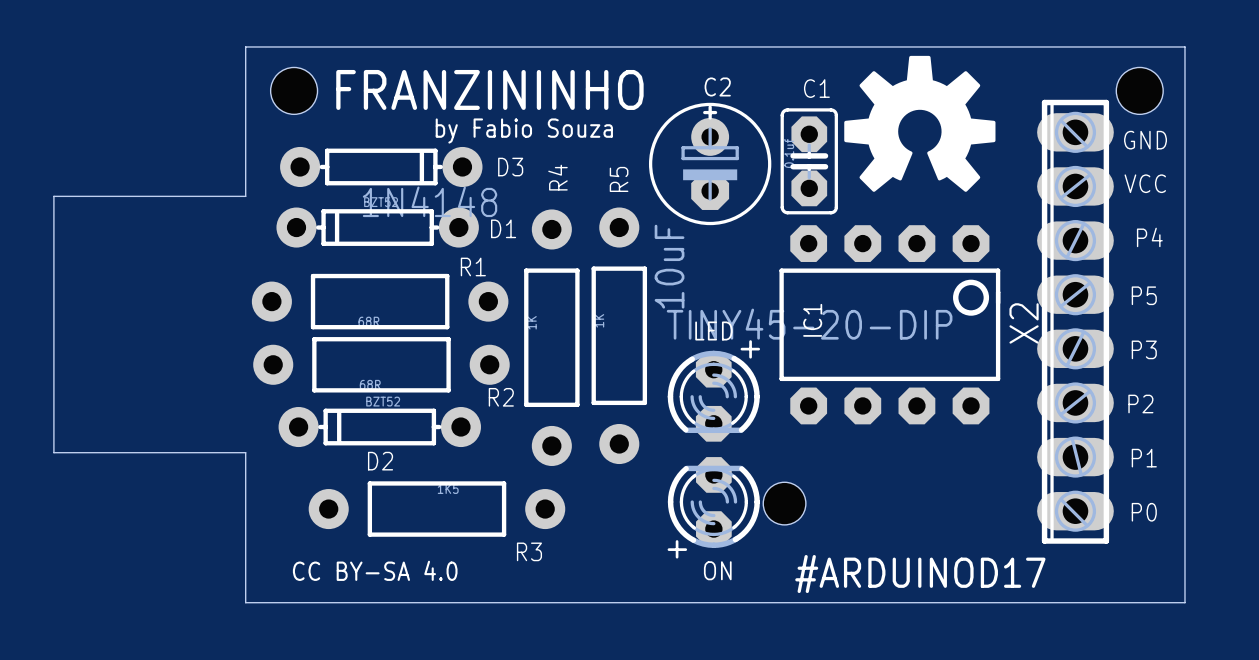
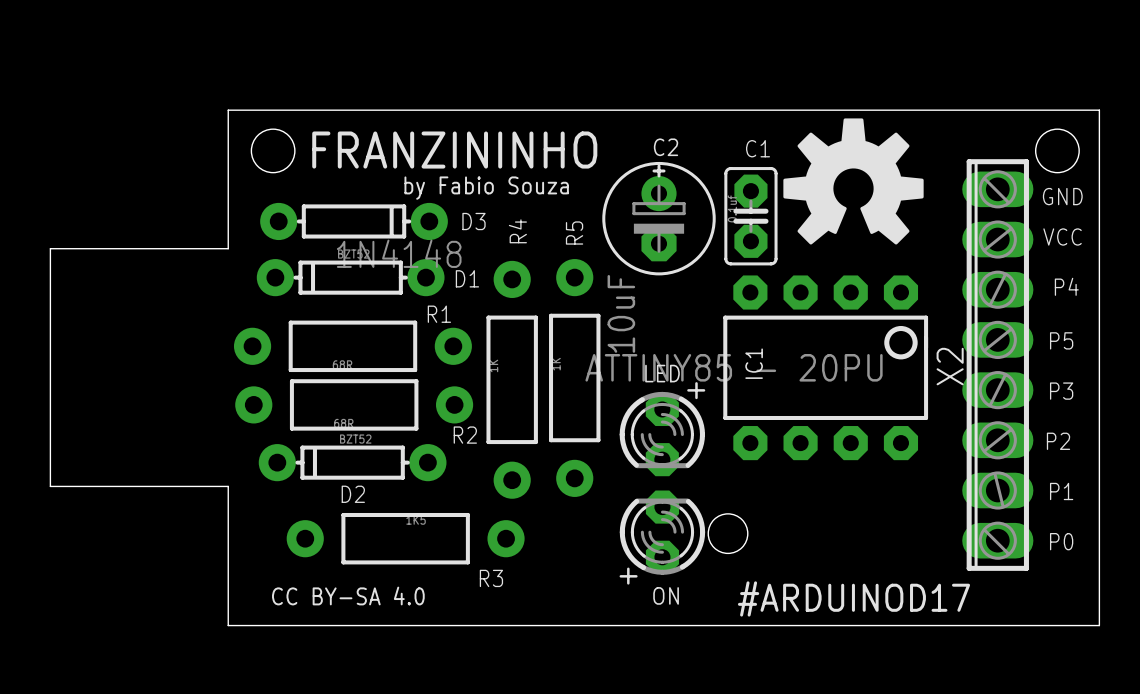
IC1 value: TINY45-20-DIP (809, 324) -> ATTINY85 - 20PU (734, 367)

